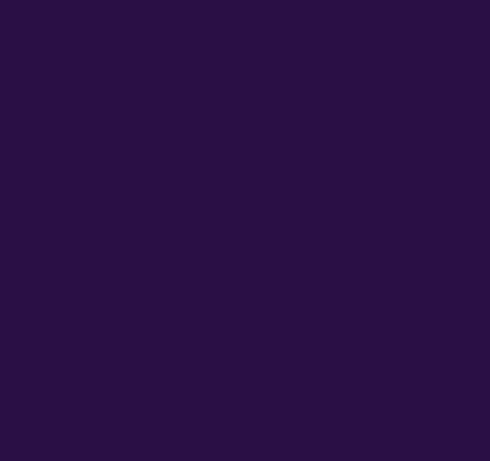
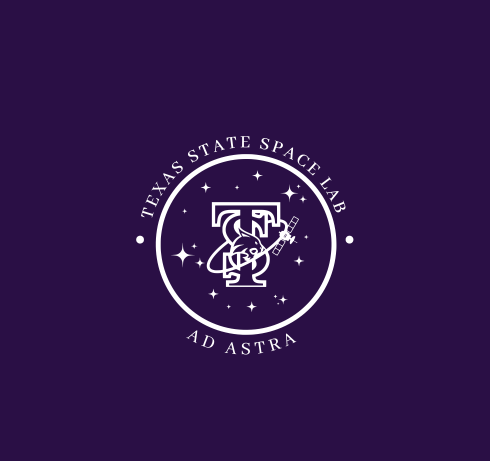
drawing: none -> [136, 136, 354, 355]

